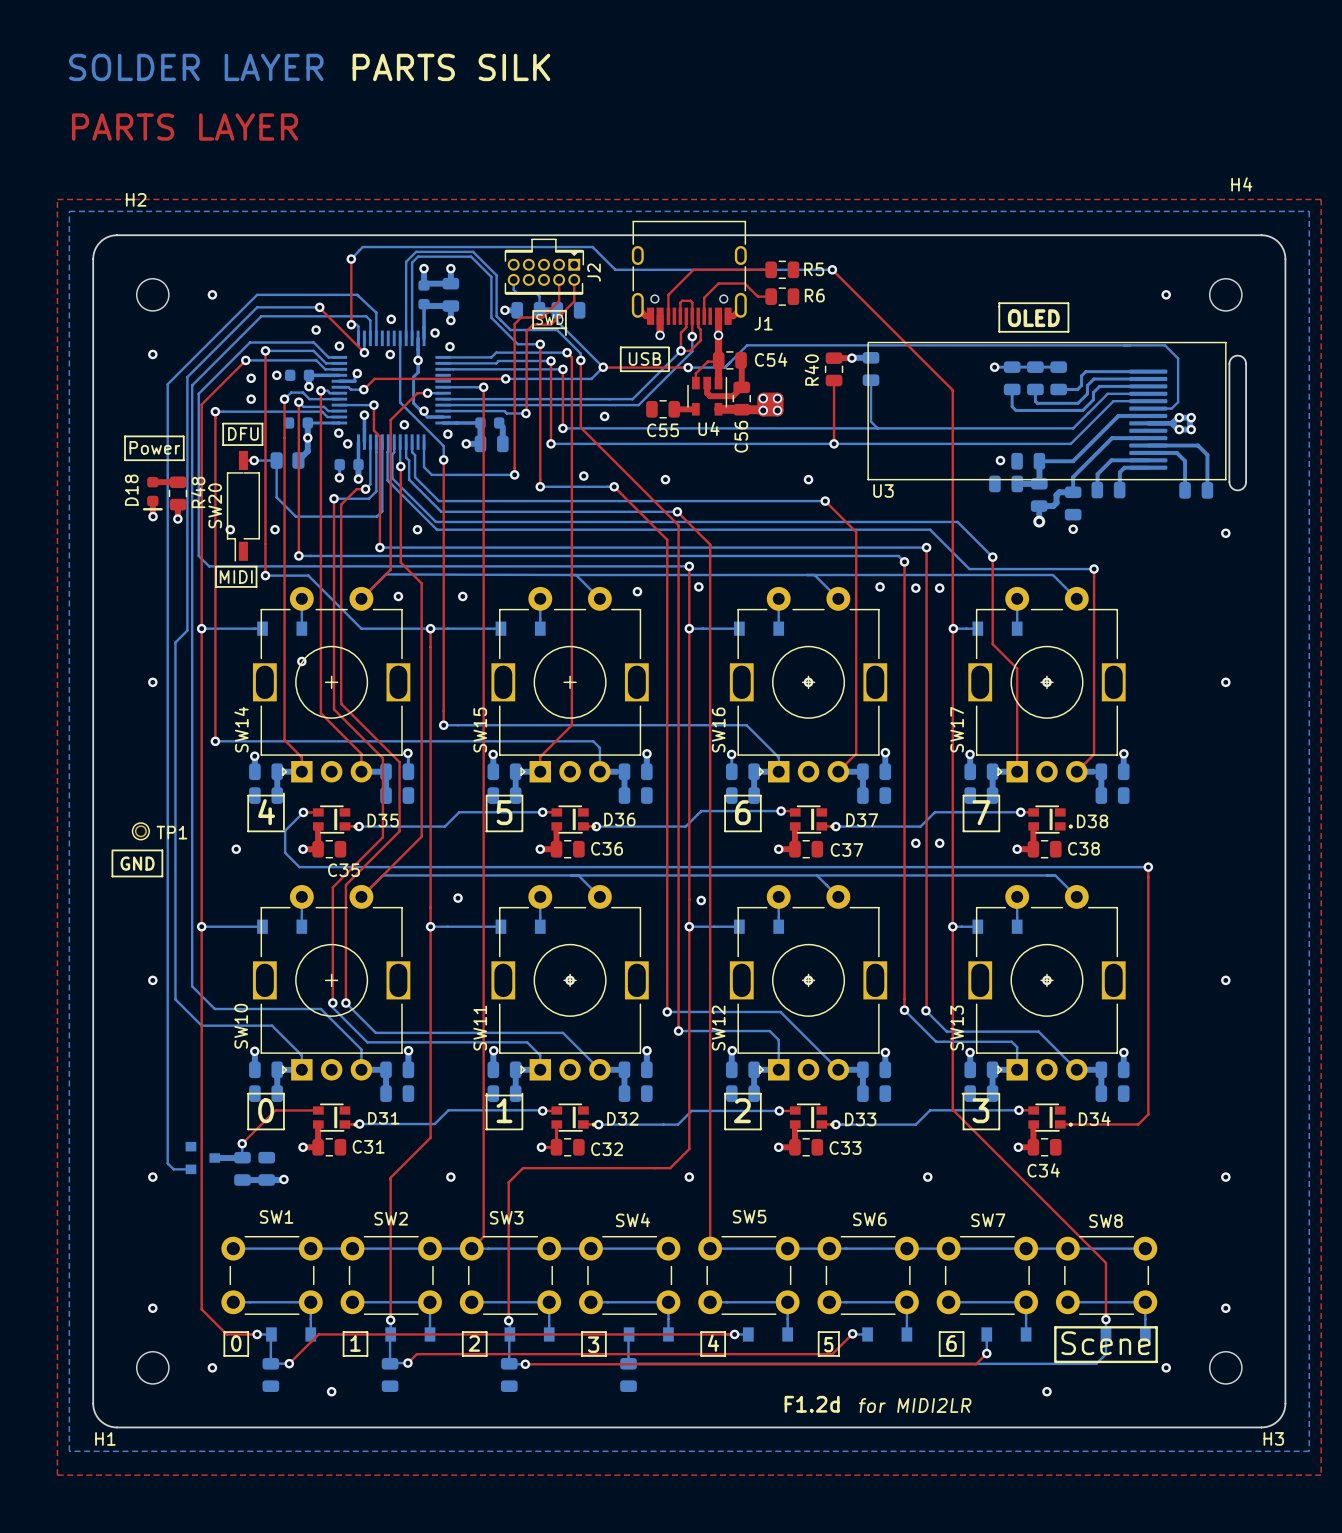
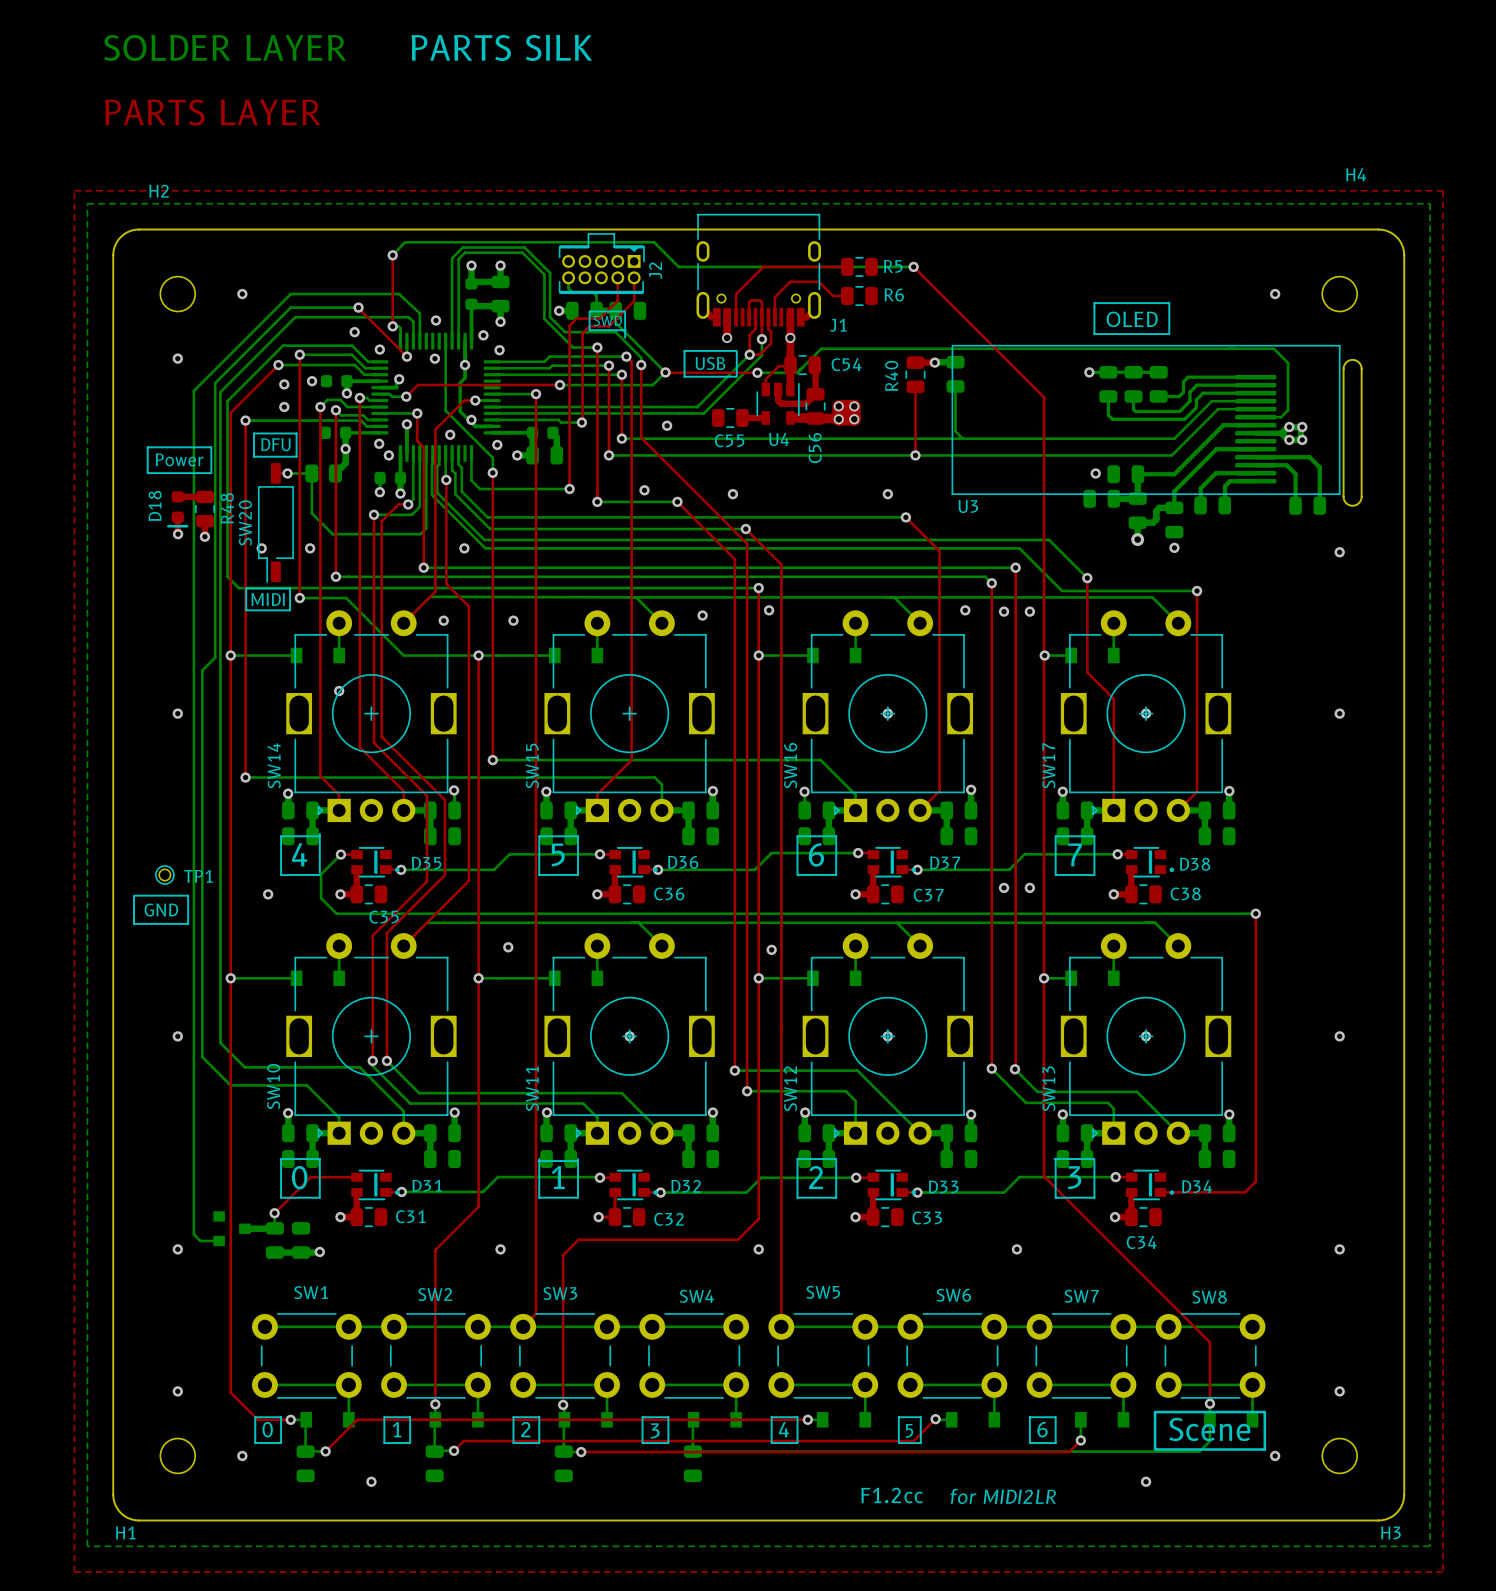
text: F1.2d (812, 1404) -> F1.2cc (892, 1495)

